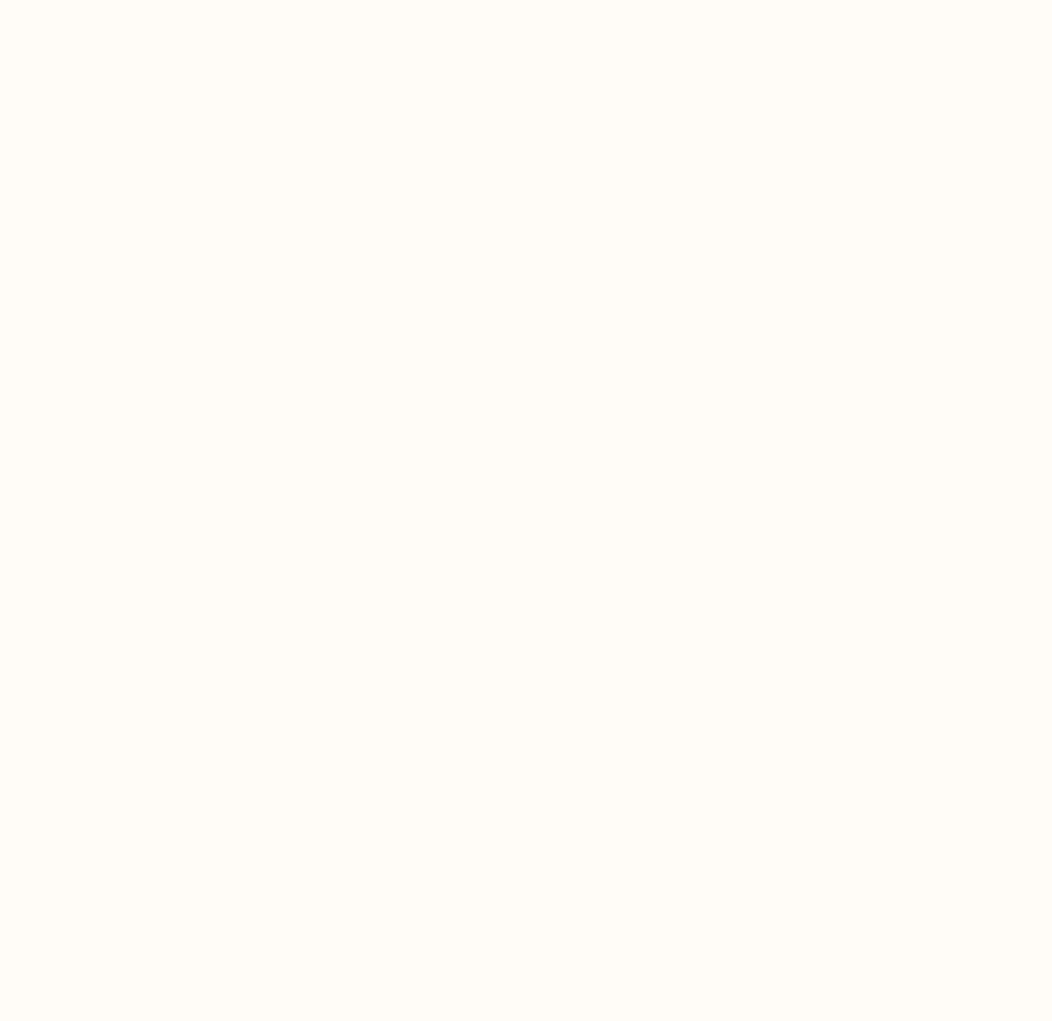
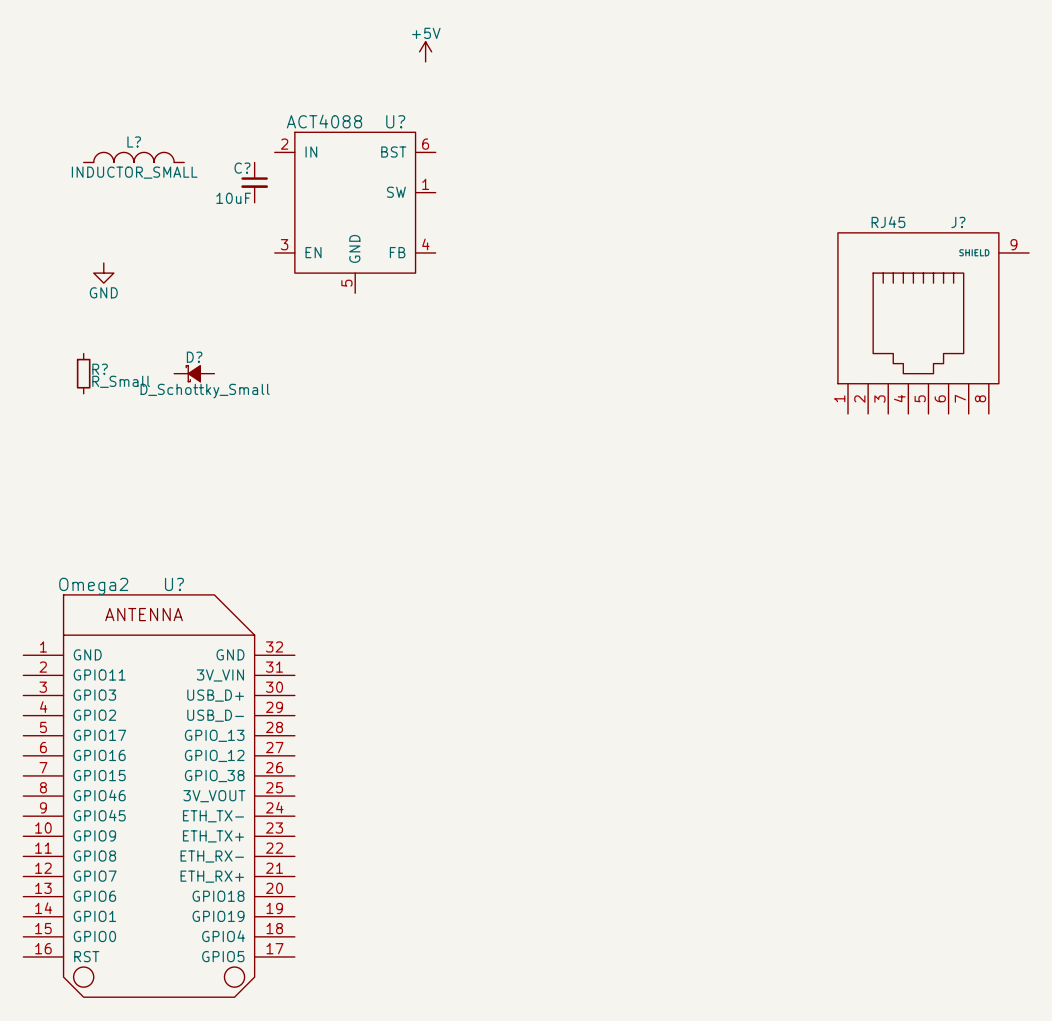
power symbol: none -> +5V (425, 51)
L?: none -> INDUCTOR_SMALL (133, 157)
C?: none -> 10uF (254, 182)
U?: none -> ACT4088 (355, 212)
power symbol: none -> GND (103, 273)
J?: none -> RJ45 (933, 323)
R?: none -> R_Small (83, 373)
D?: none -> D_Schottky_Small (194, 373)
U?: none -> Omega2 (159, 796)

